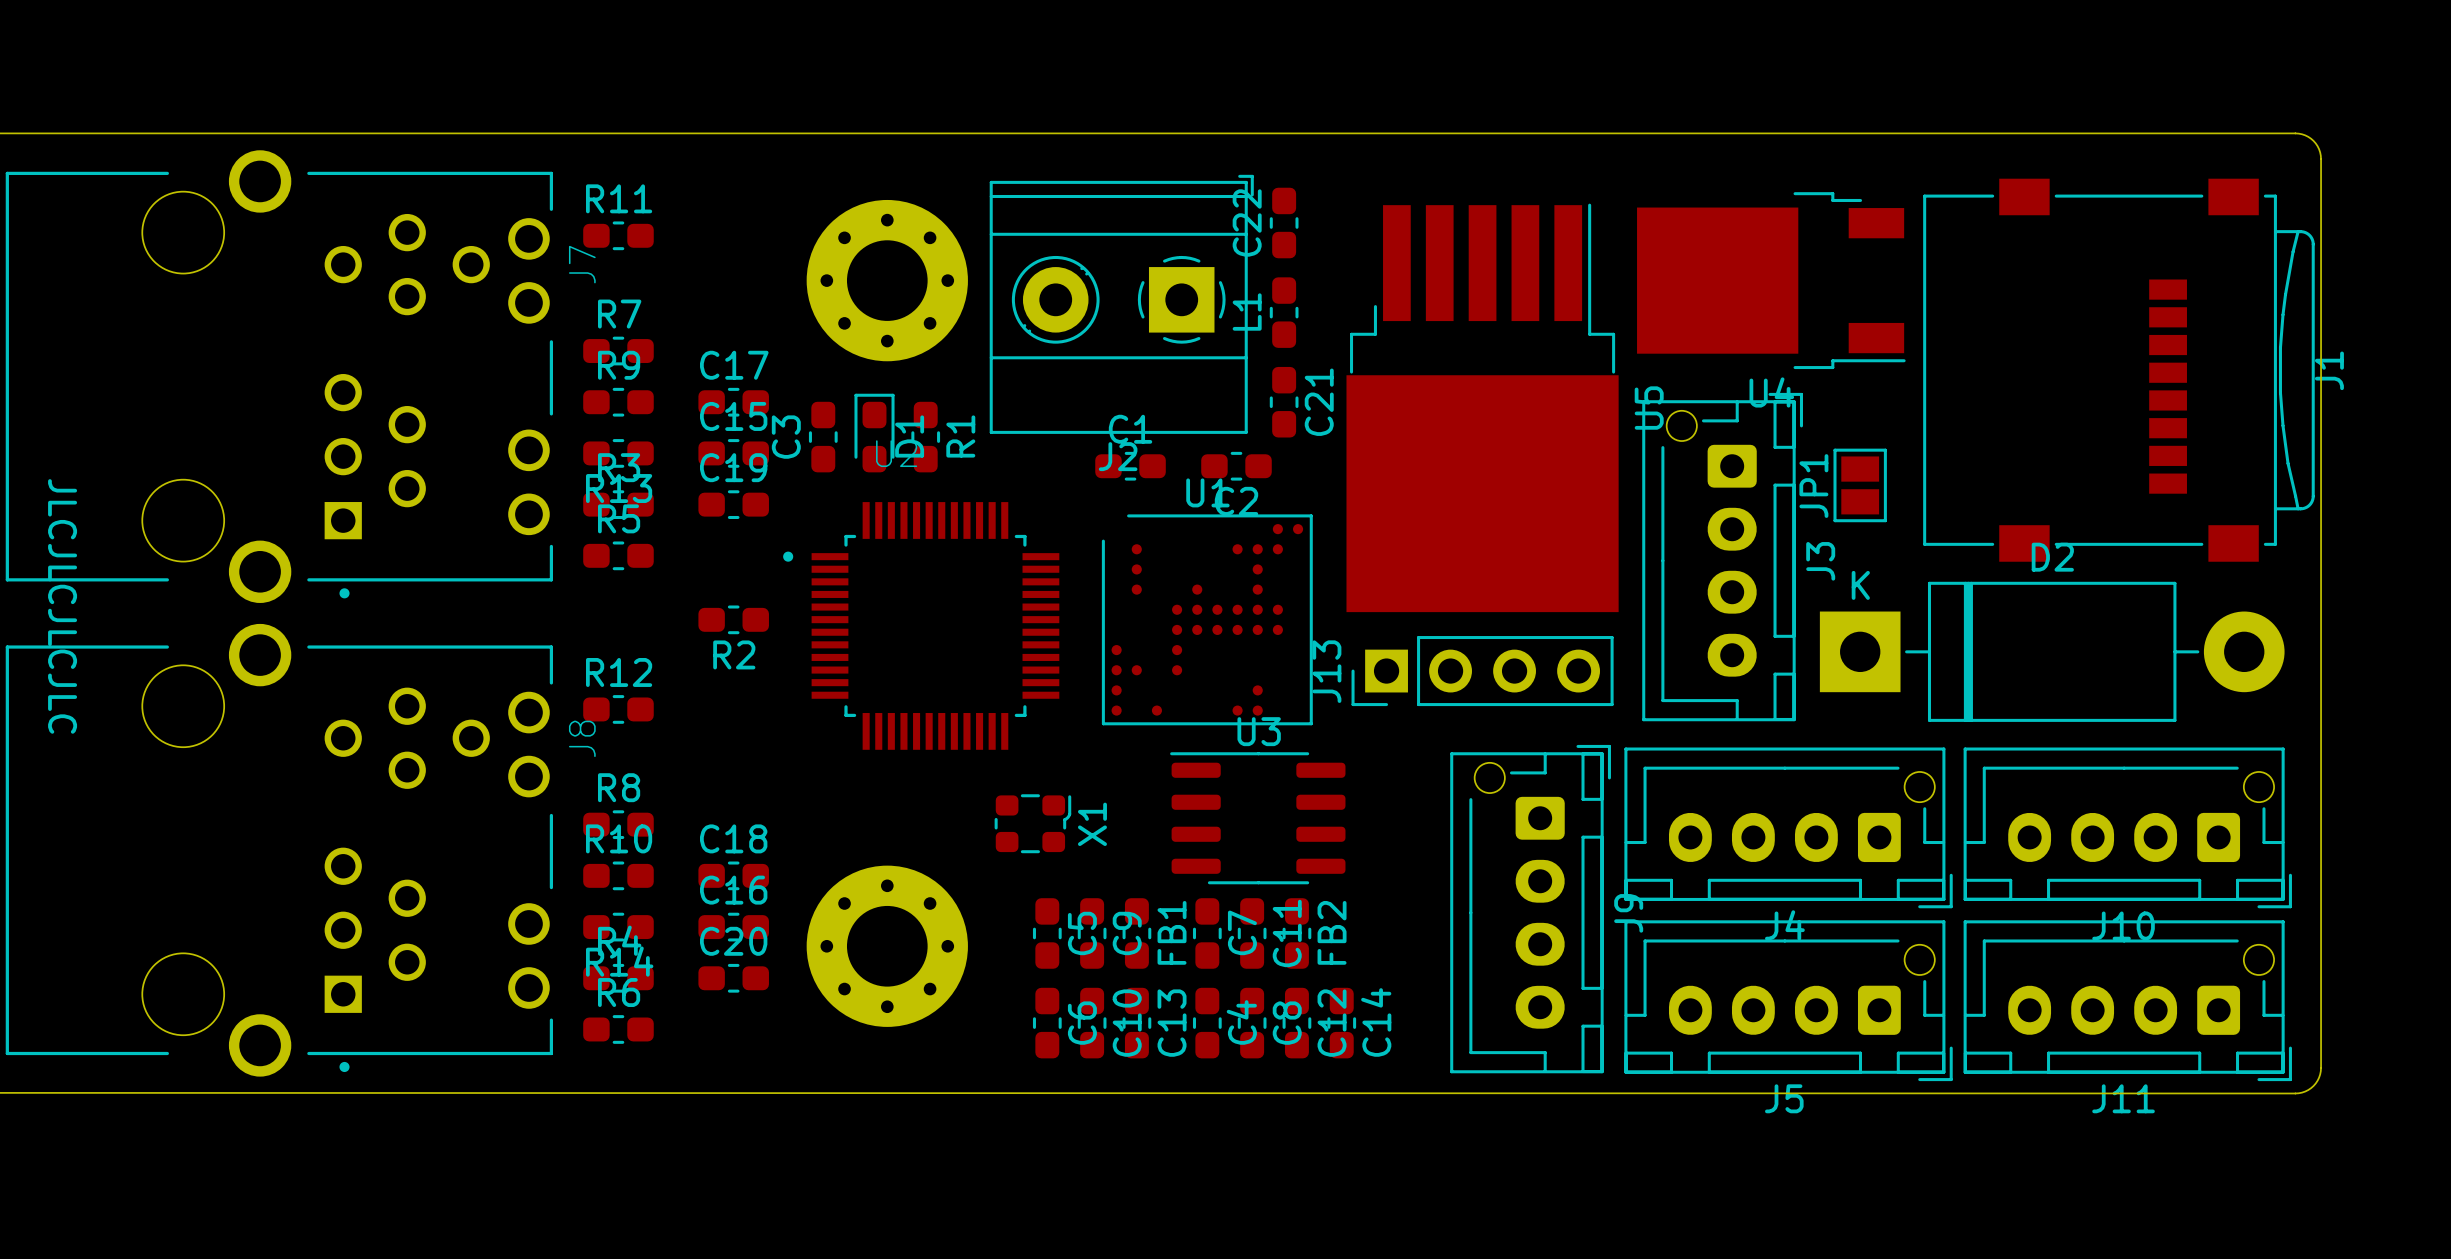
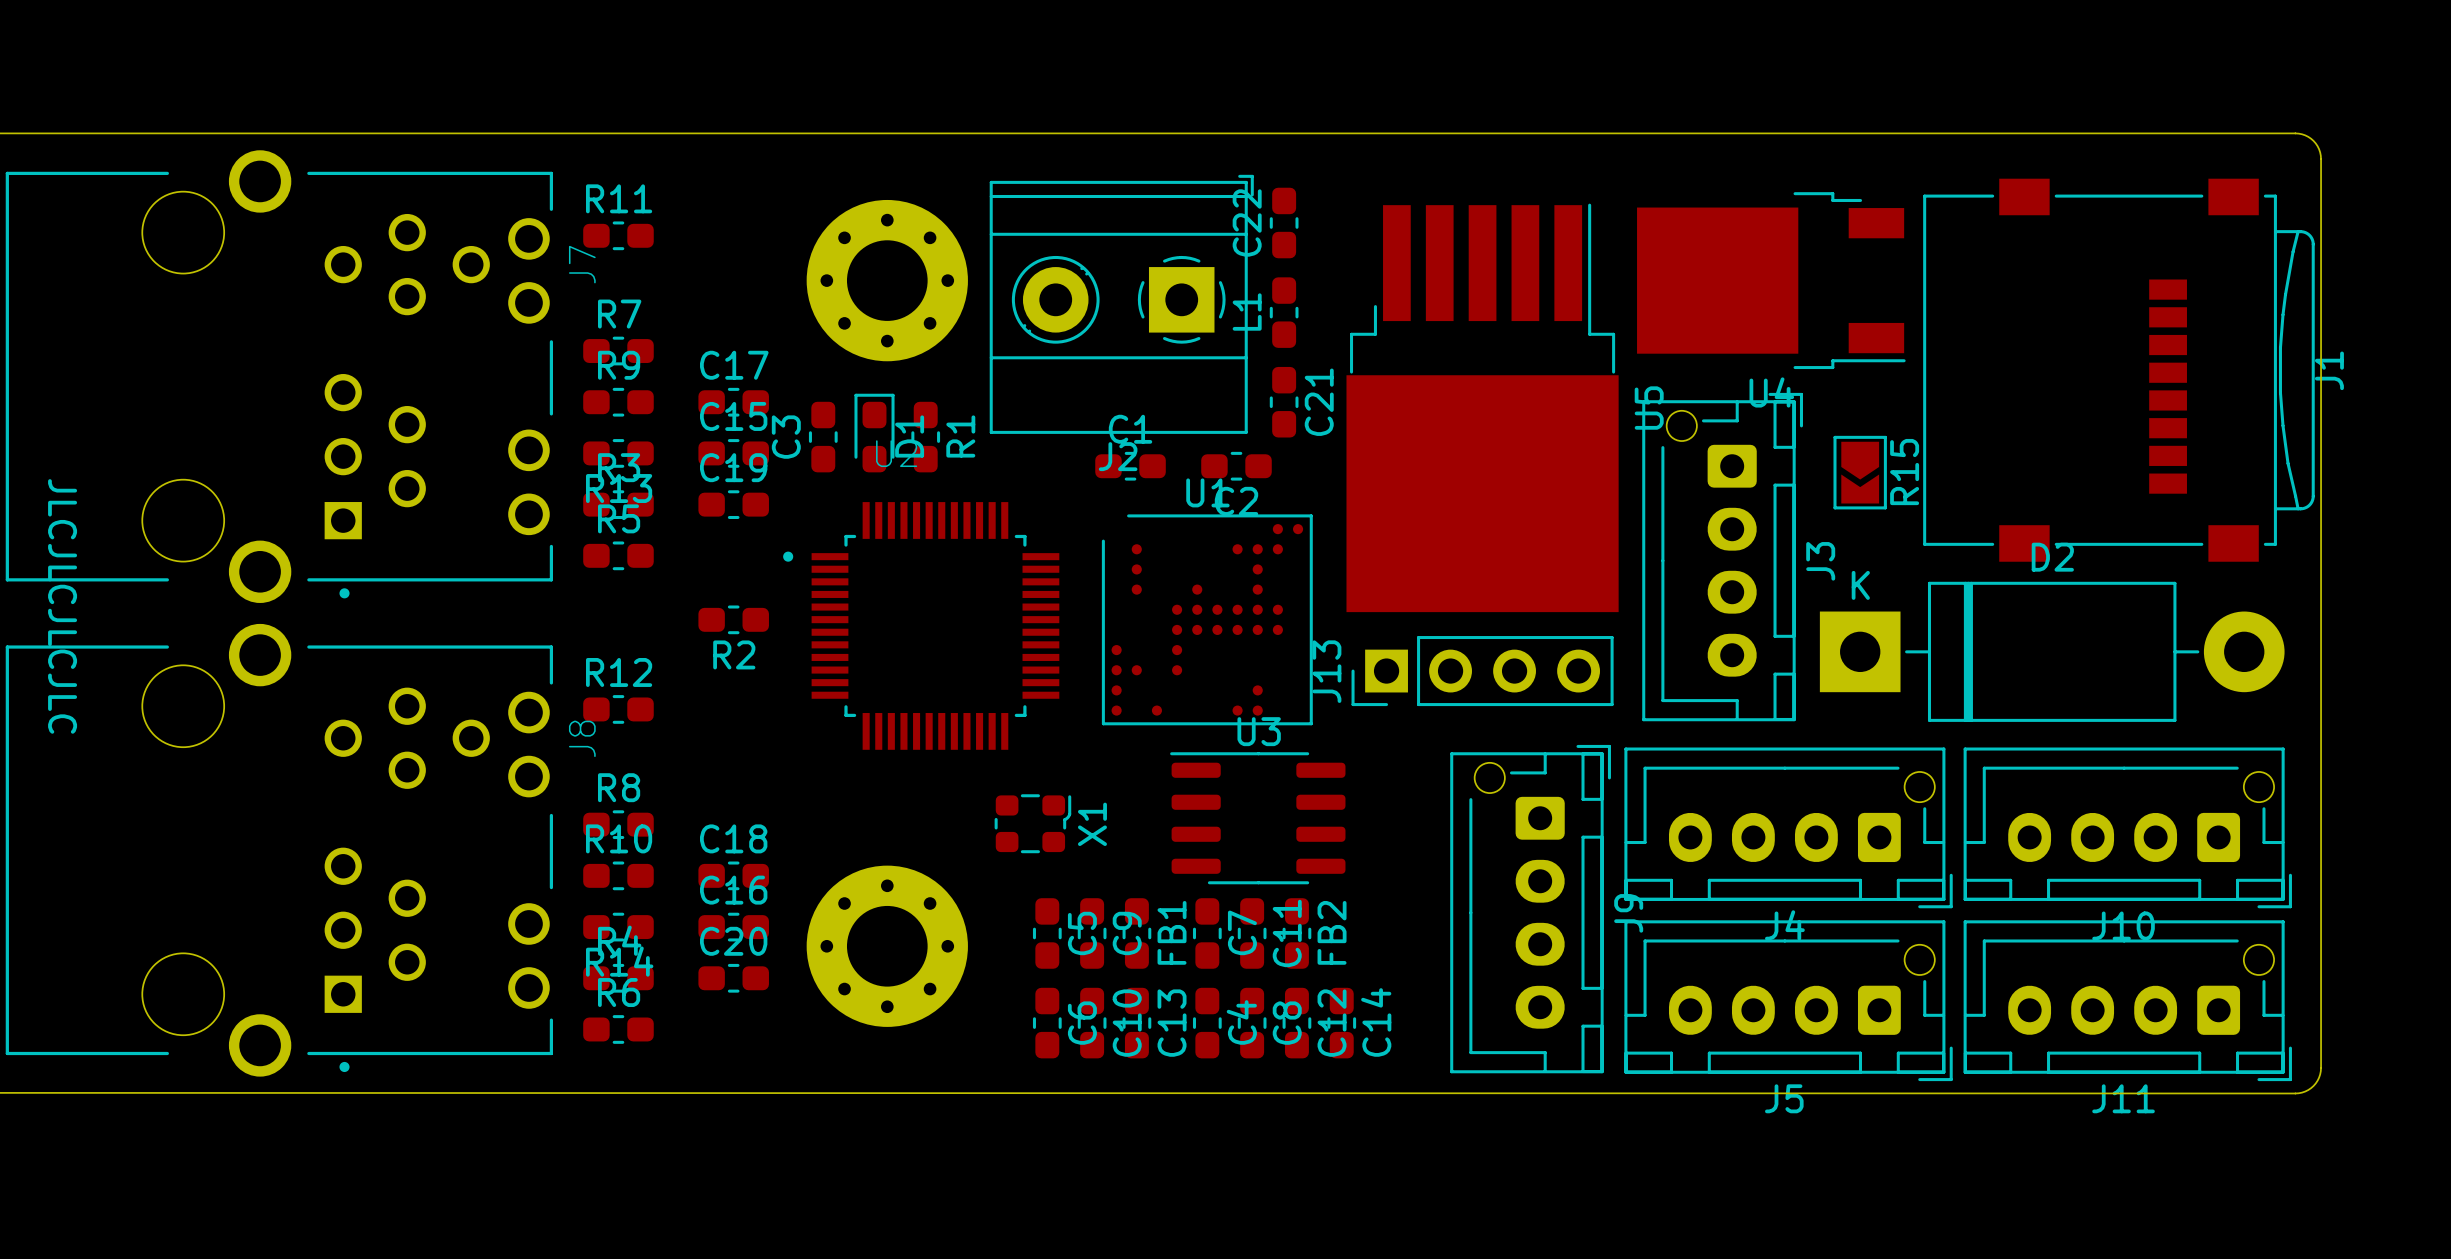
R15: none -> (1860, 472)
JP1: (1860, 485) -> none

